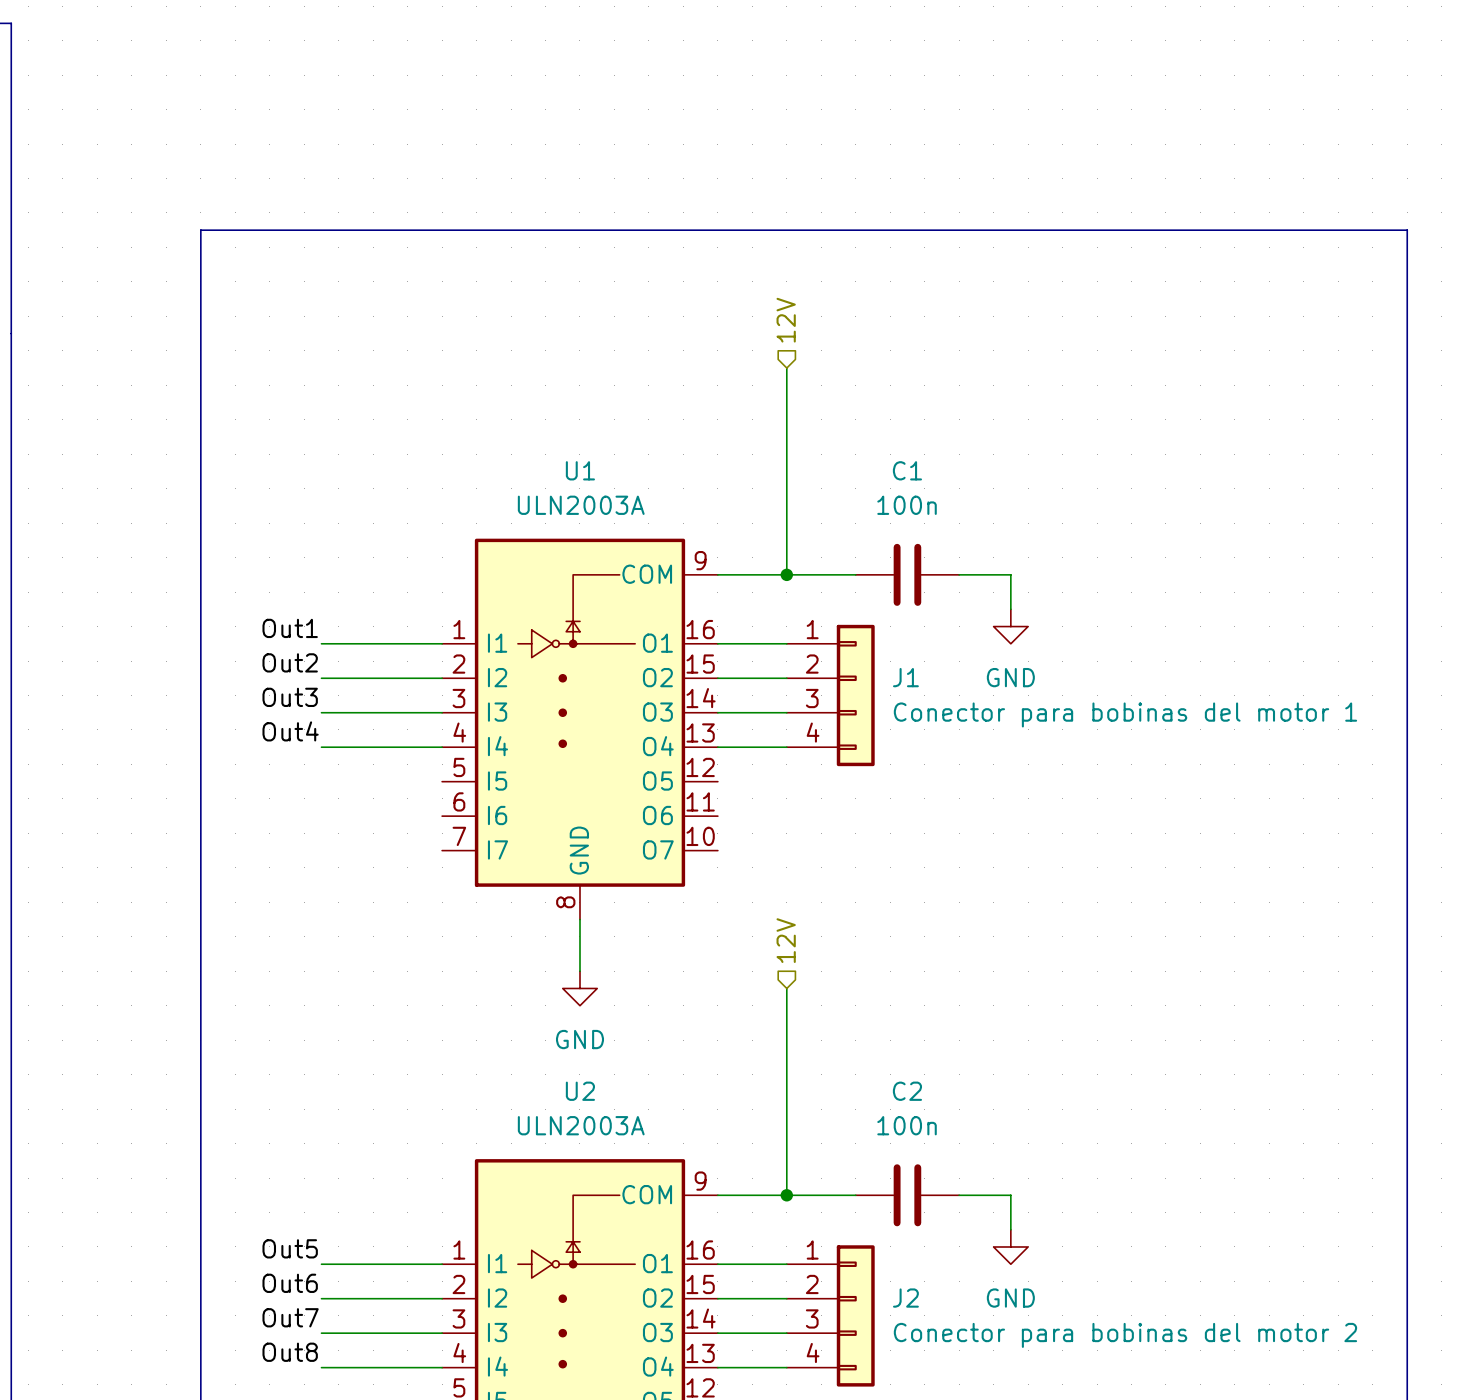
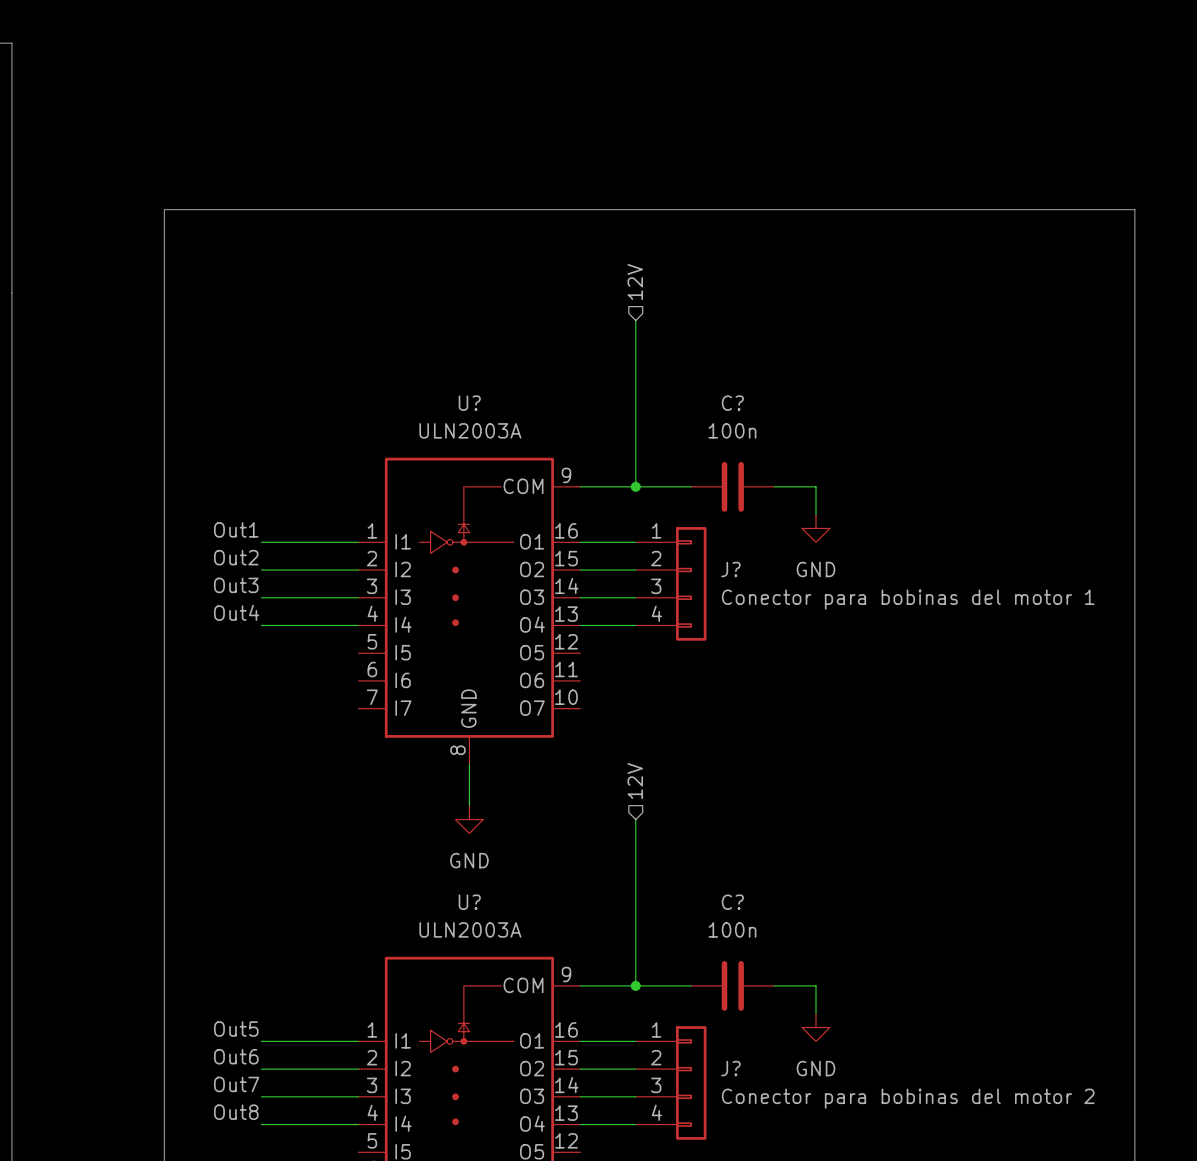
U1 name: U1 (580, 470) -> U? (469, 403)
C1 name: C1 (907, 470) -> C? (732, 403)
J1 name: J1 (905, 677) -> J? (730, 569)
U2 name: U2 (580, 1091) -> U? (469, 902)
C2 name: C2 (907, 1091) -> C? (732, 902)
J2 name: J2 (905, 1298) -> J? (730, 1068)

